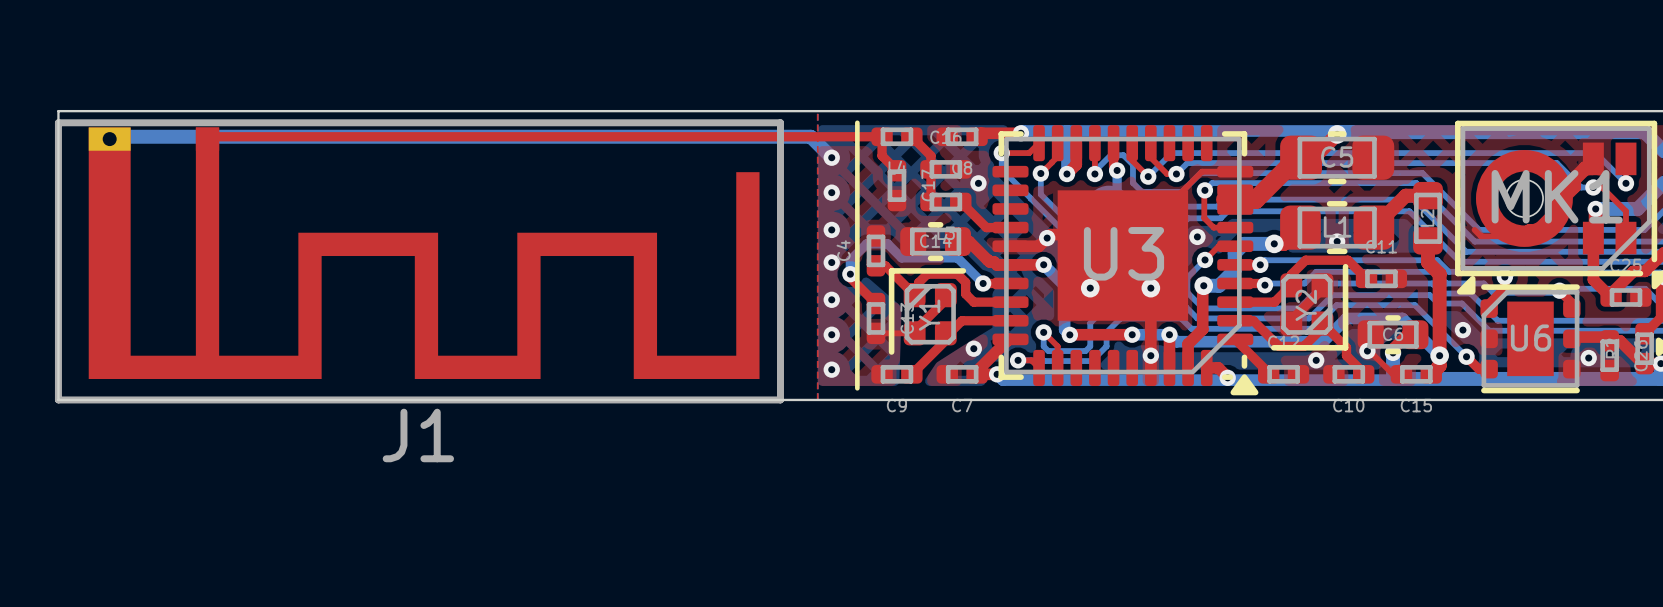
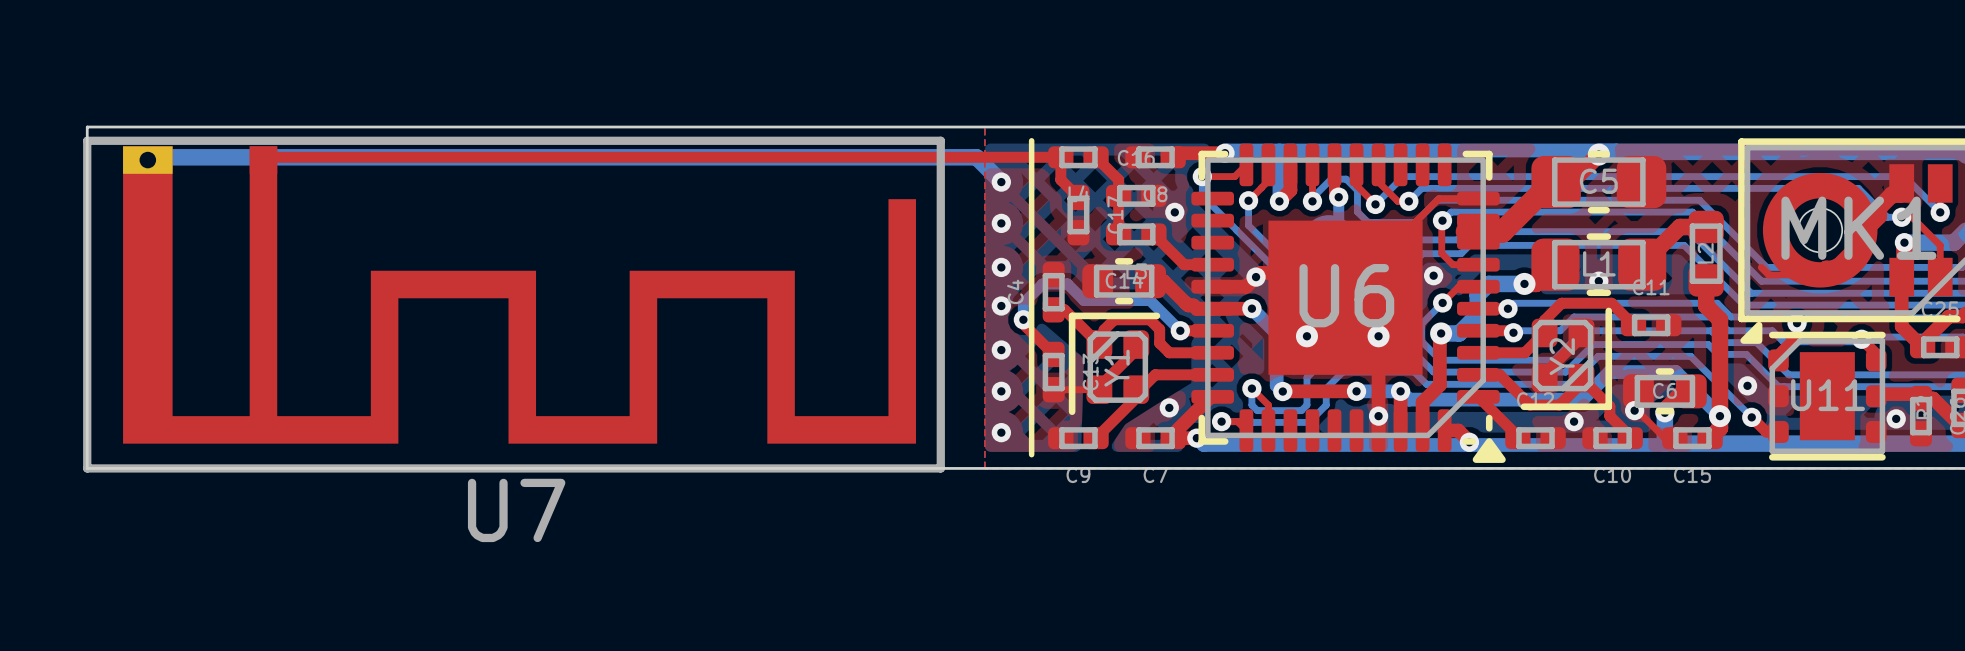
U3 name: U3 (1123, 253) -> U6 (1346, 295)
U6 name: U6 (1531, 337) -> U11 (1828, 395)
J1 name: J1 (418, 435) -> U7 (516, 510)

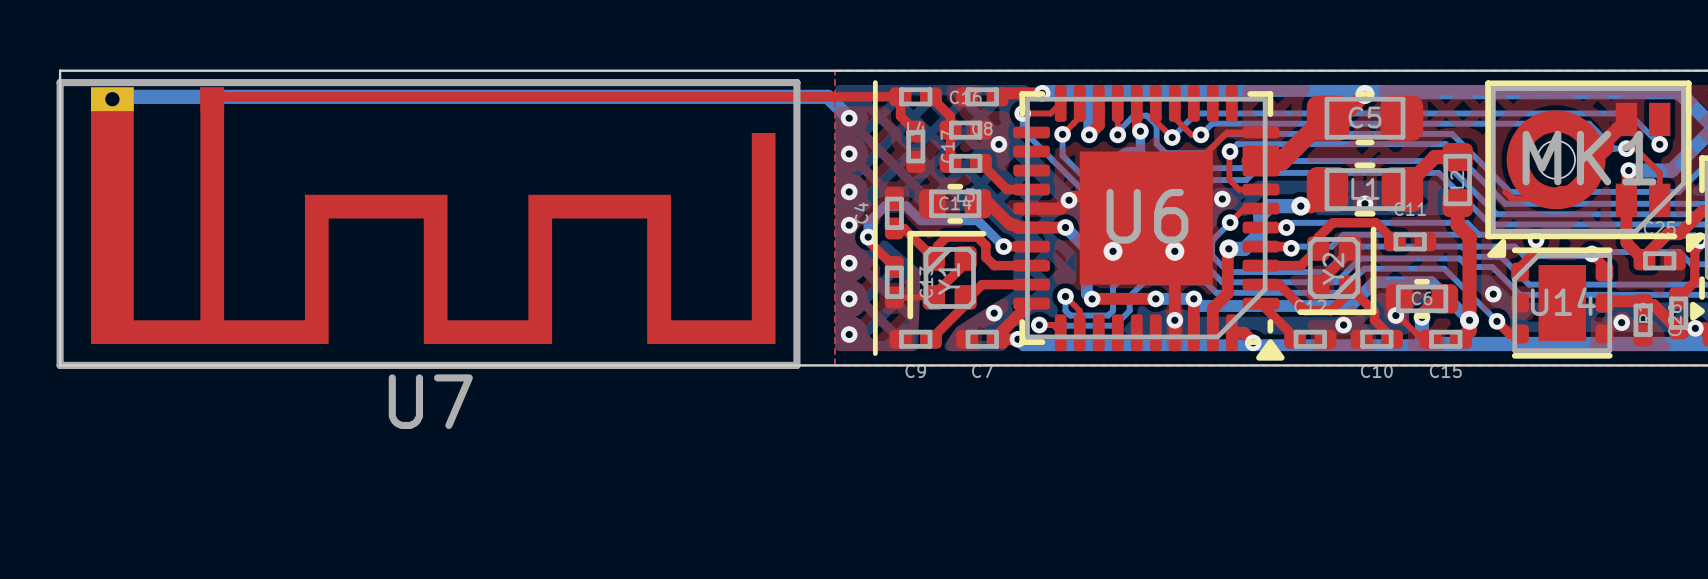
U11 name: U11 (1828, 395) -> U14 (1563, 301)

